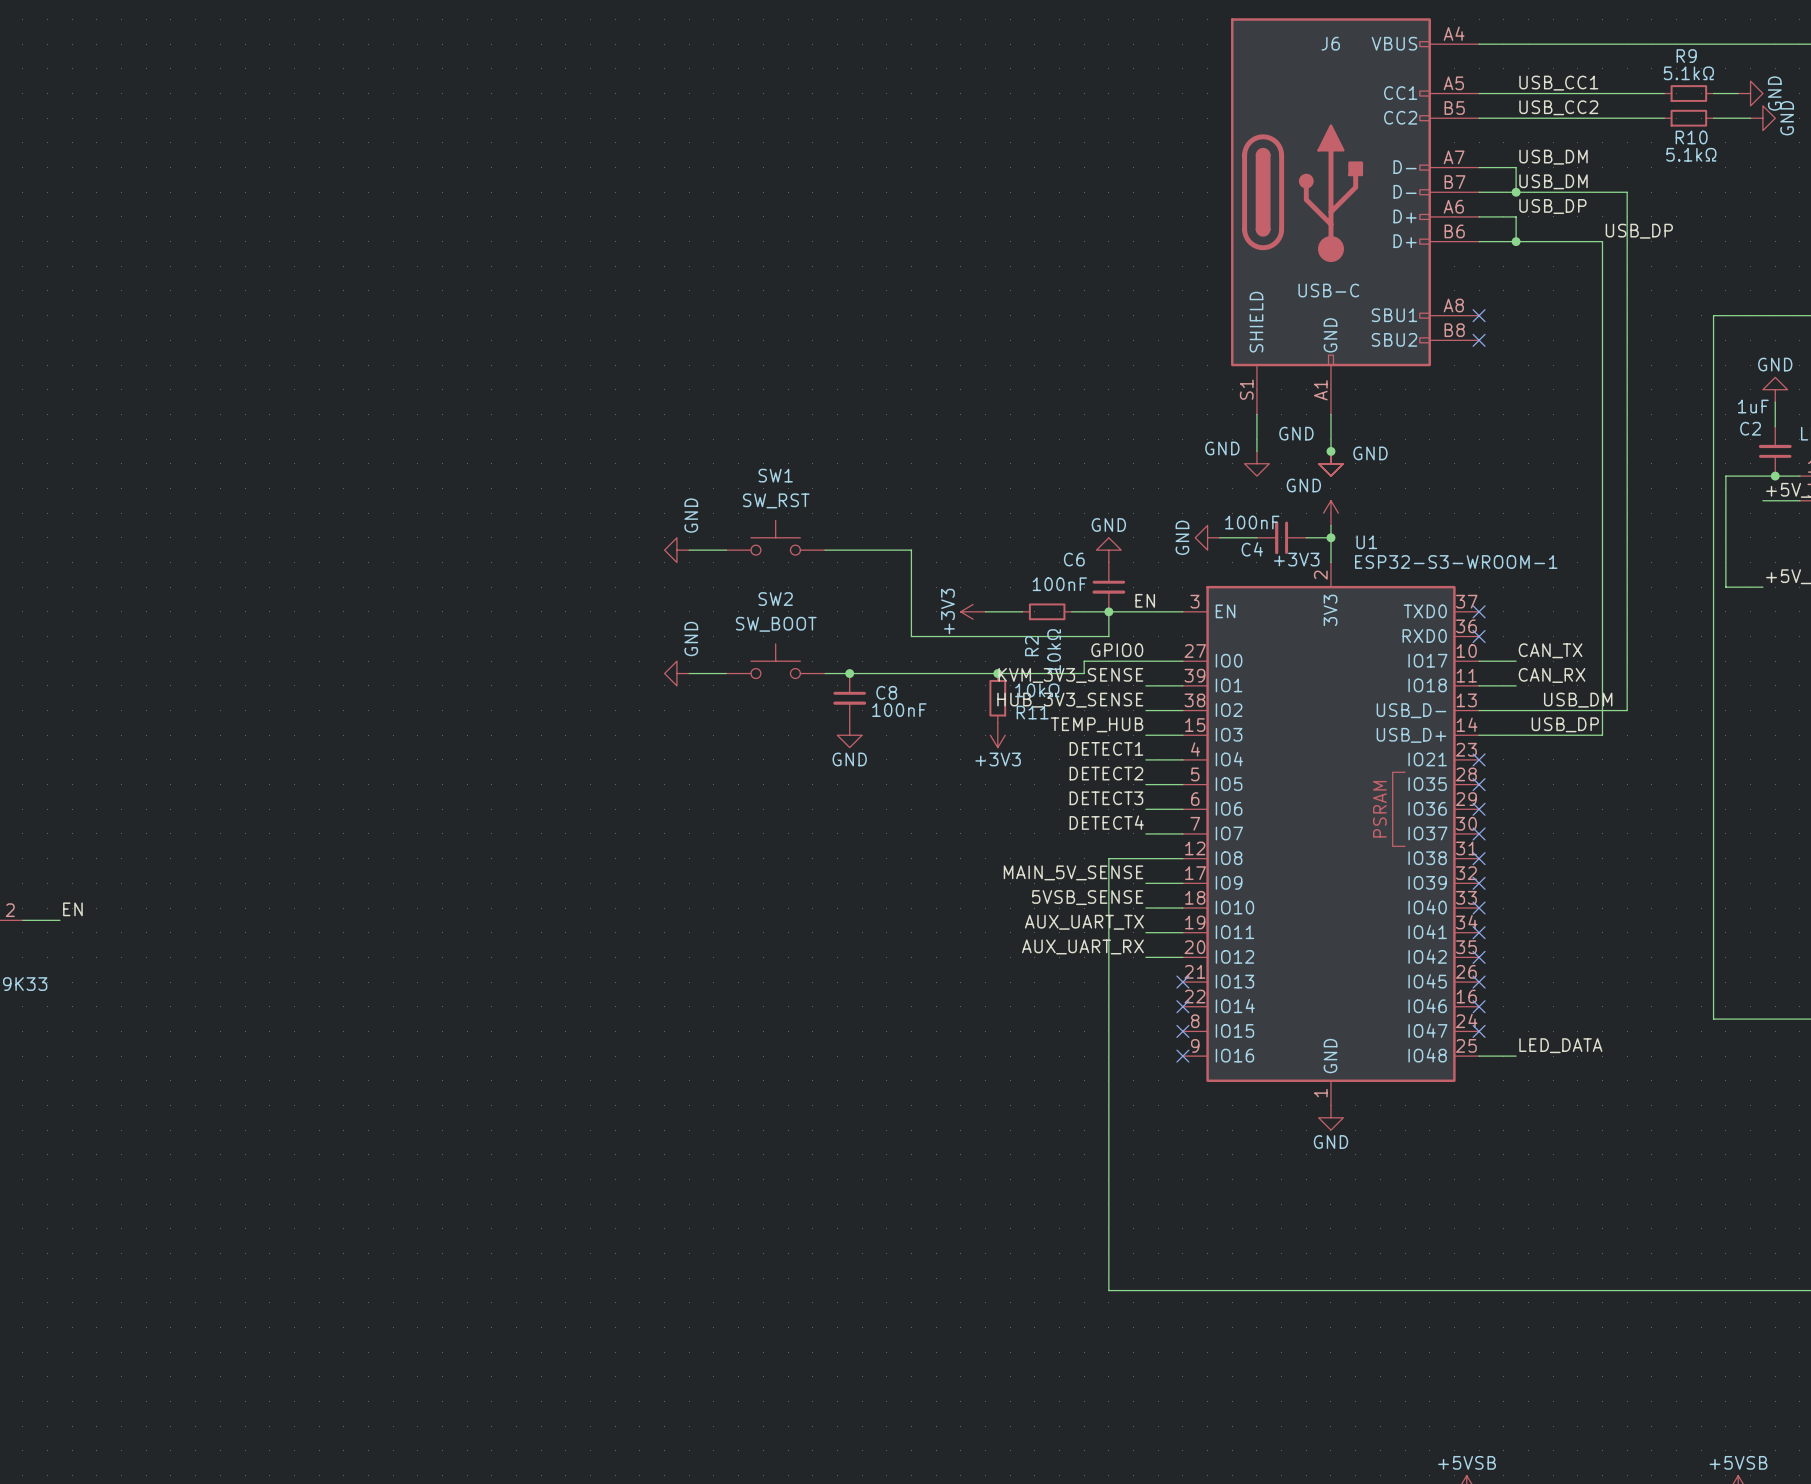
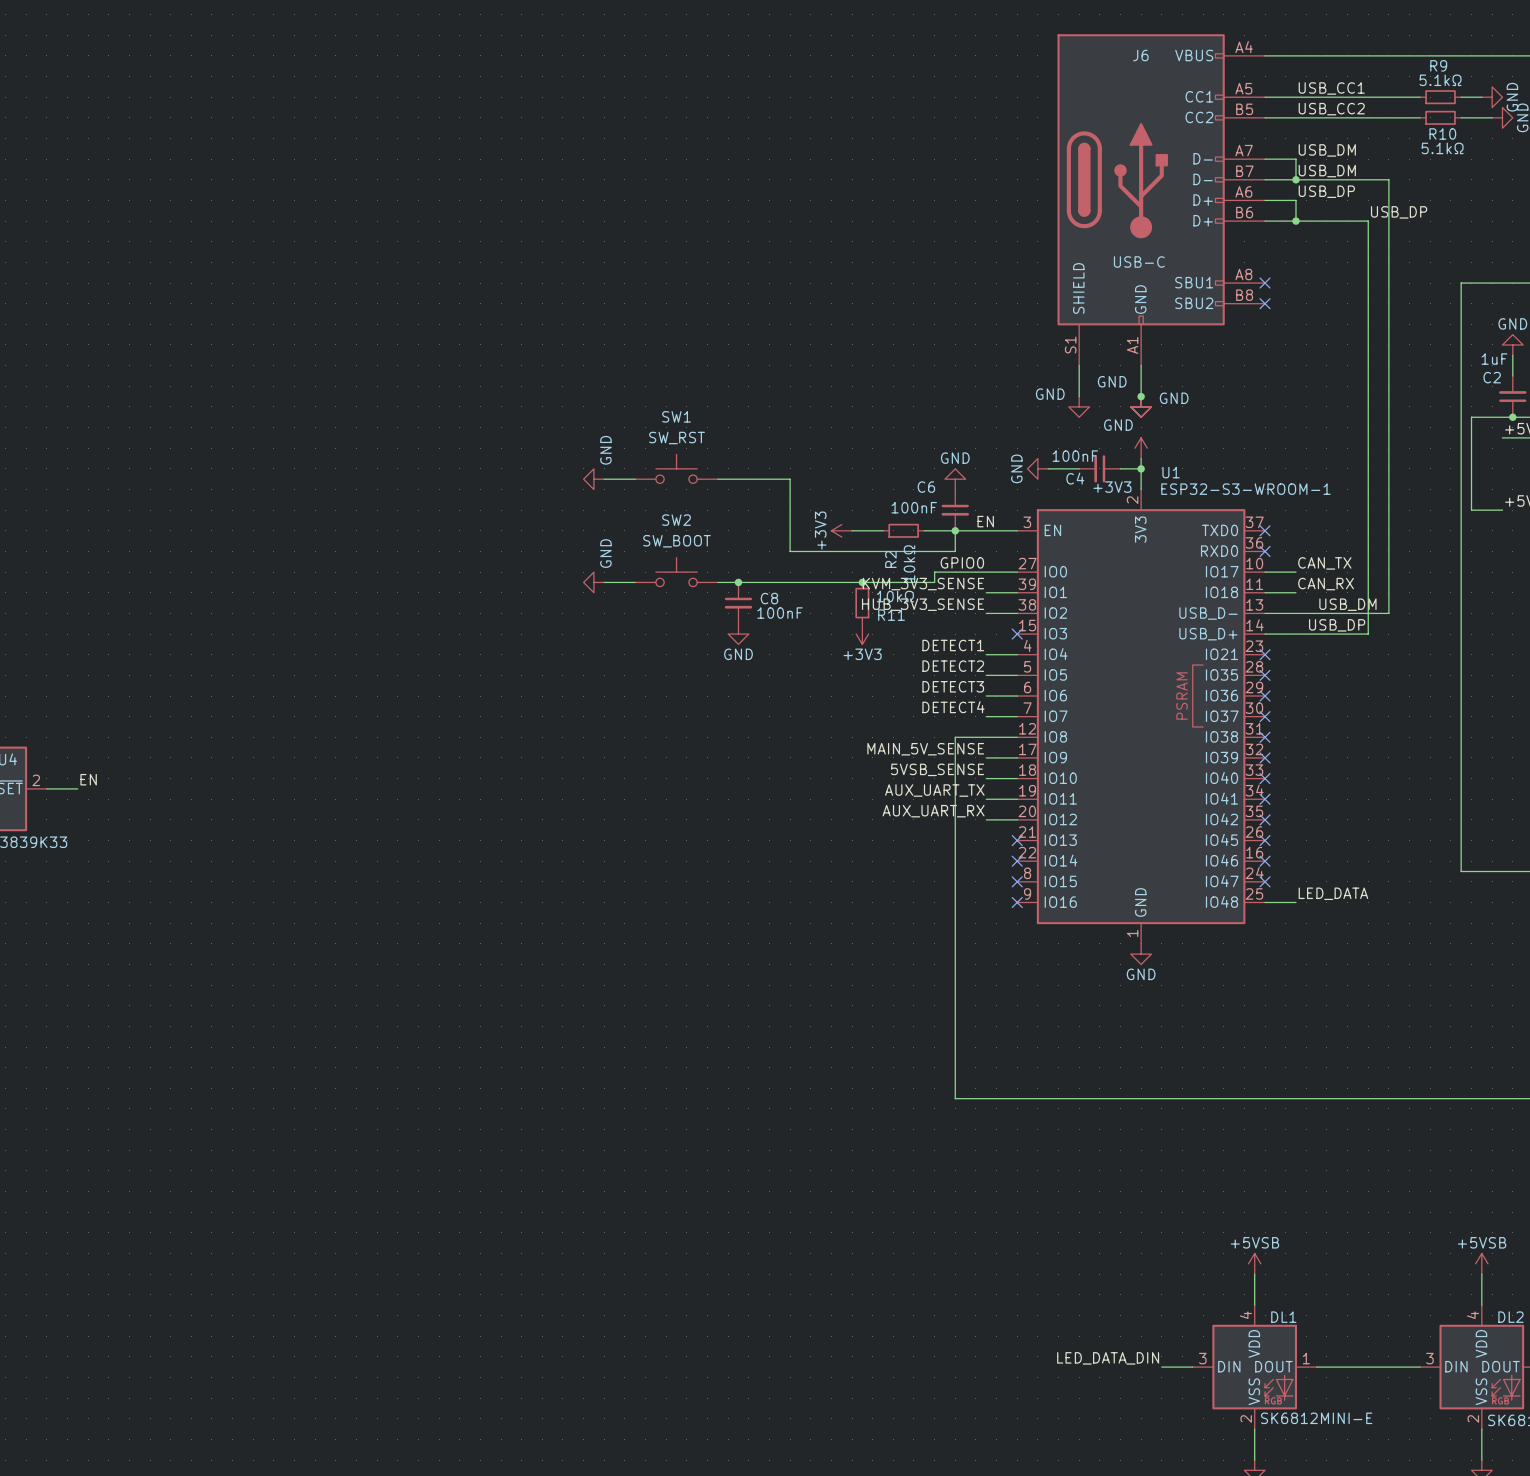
label: TEMP_HUB (1097, 724) -> none
wire: (1145, 735) (1182, 735) -> none
no-connect mark: none -> (1017, 634)

